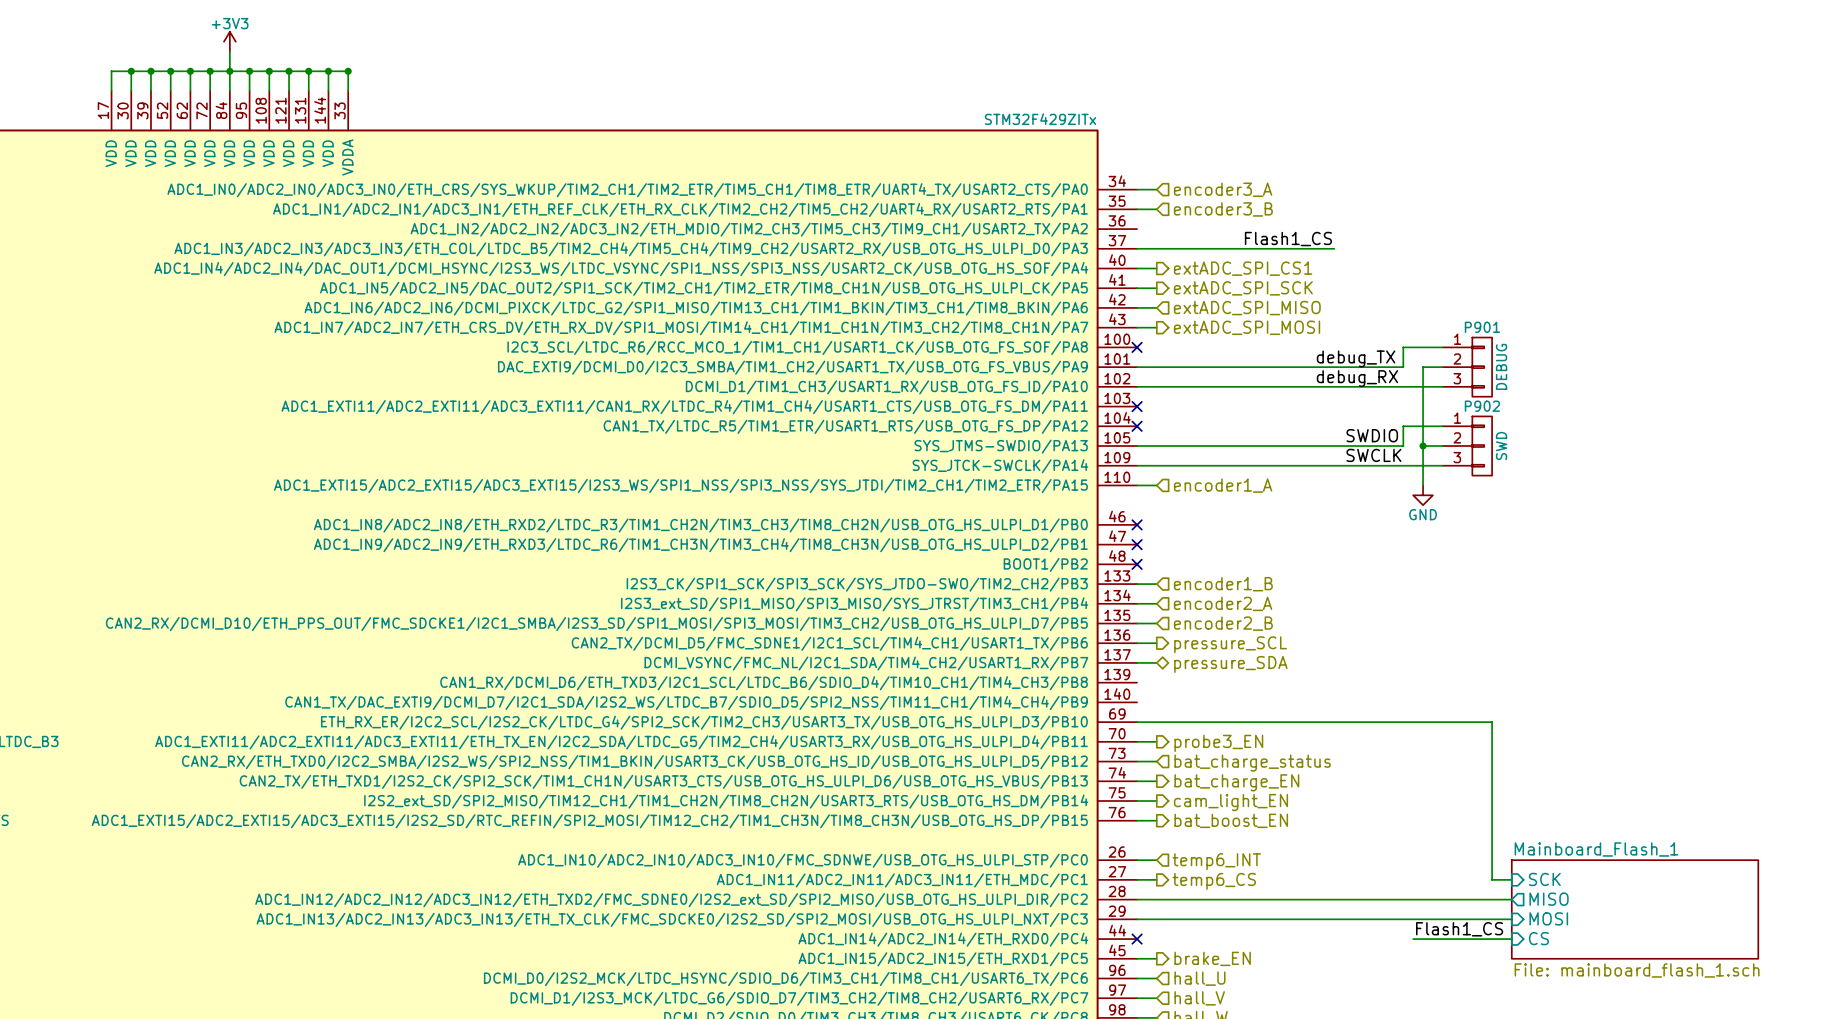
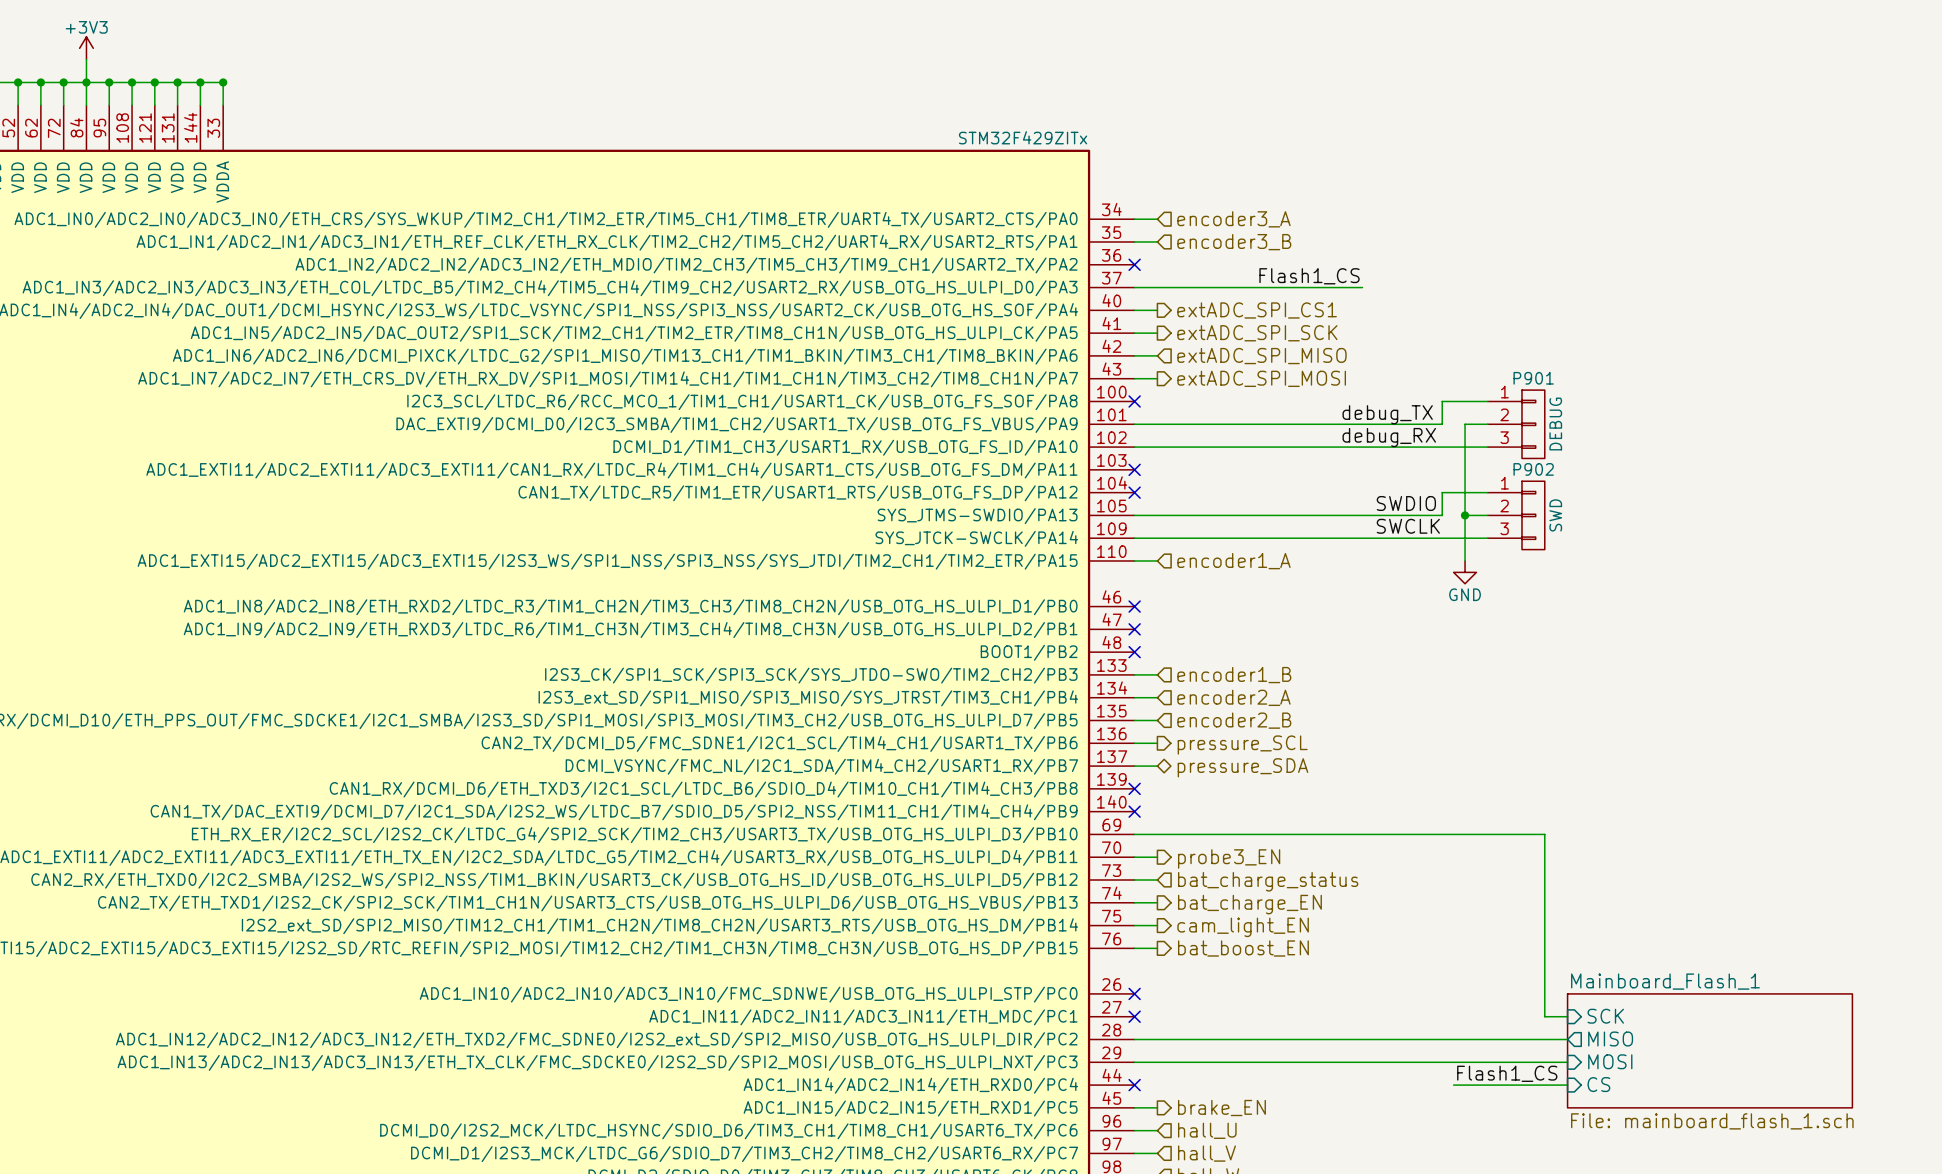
no-connect mark: none -> (1134, 264)
no-connect mark: none -> (1134, 788)
no-connect mark: none -> (1134, 811)
wire: (1137, 860) (1156, 860) -> none
no-connect mark: none -> (1134, 993)
hierarchical label: temp6_INT (1216, 861) -> none
wire: (1137, 879) (1156, 879) -> none
no-connect mark: none -> (1134, 1016)
hierarchical label: temp6_CS (1214, 881) -> none

